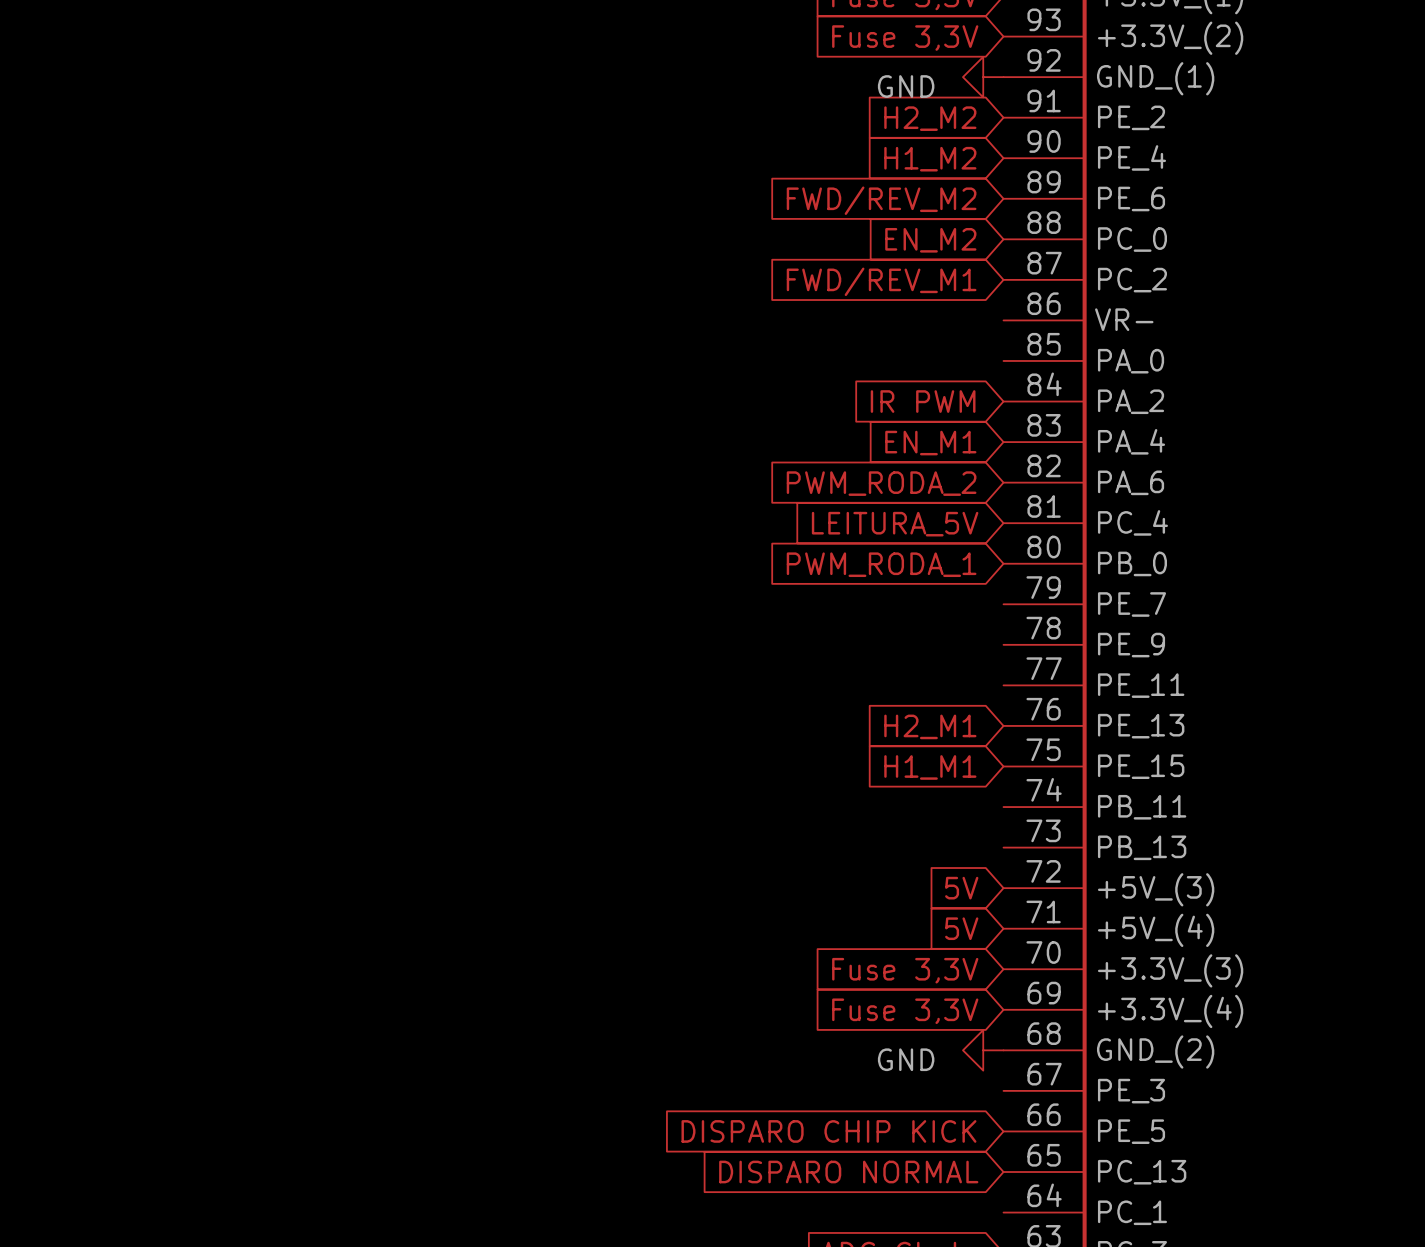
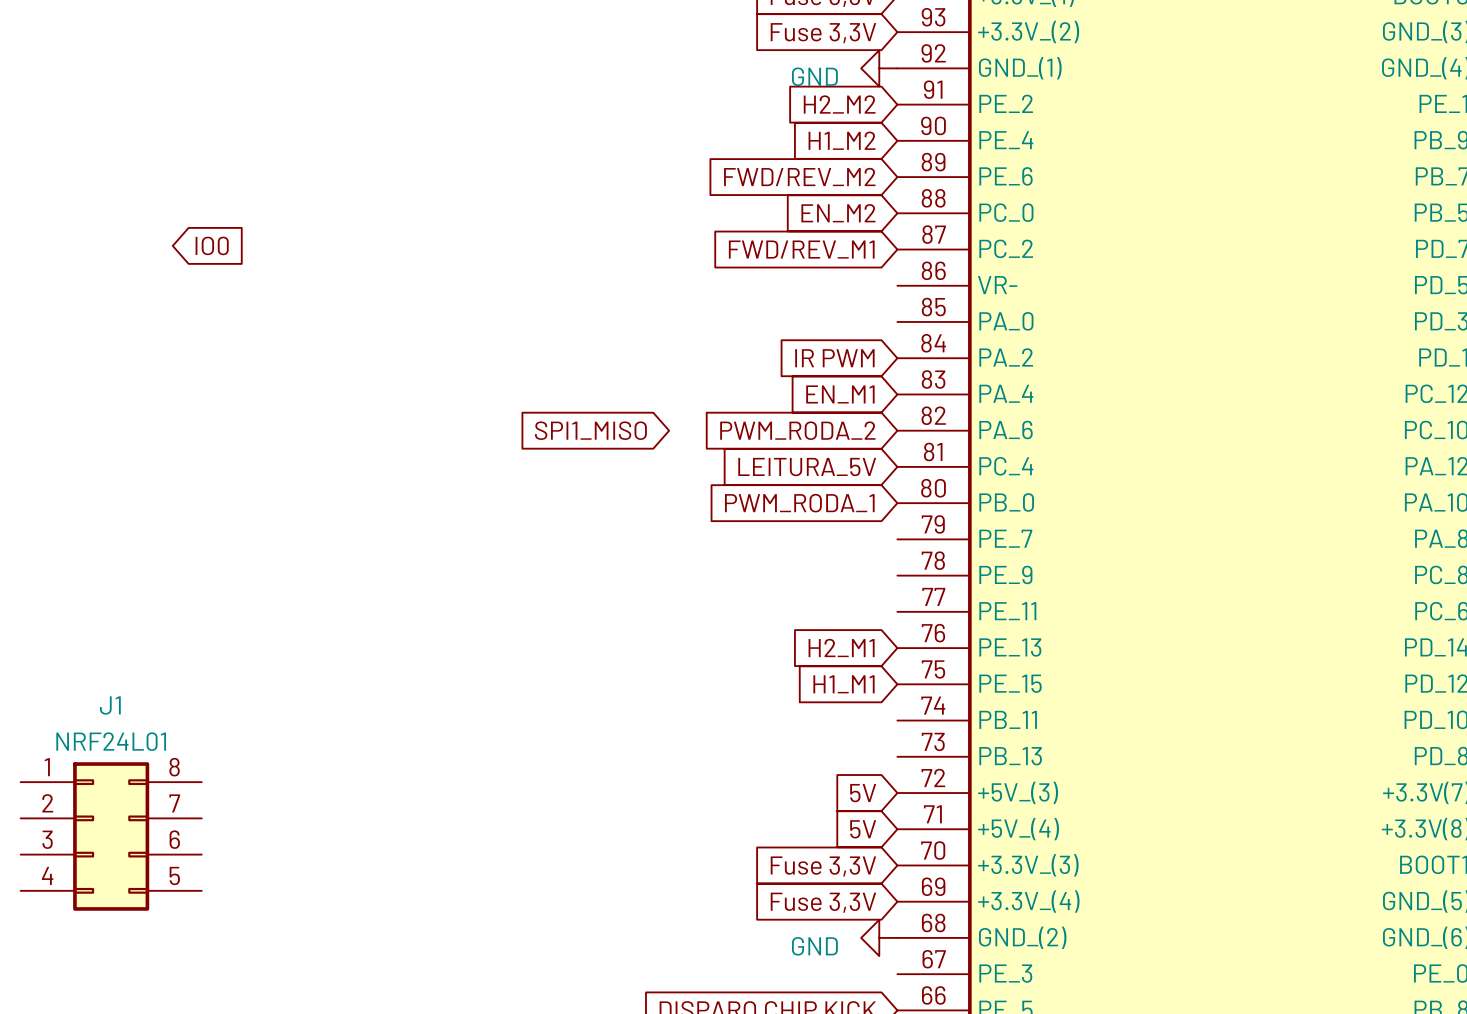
global label: none -> IO0 (212, 245)
global label: none -> SPI1_MISO (590, 430)
J1: none -> NRF24L01 (111, 836)

